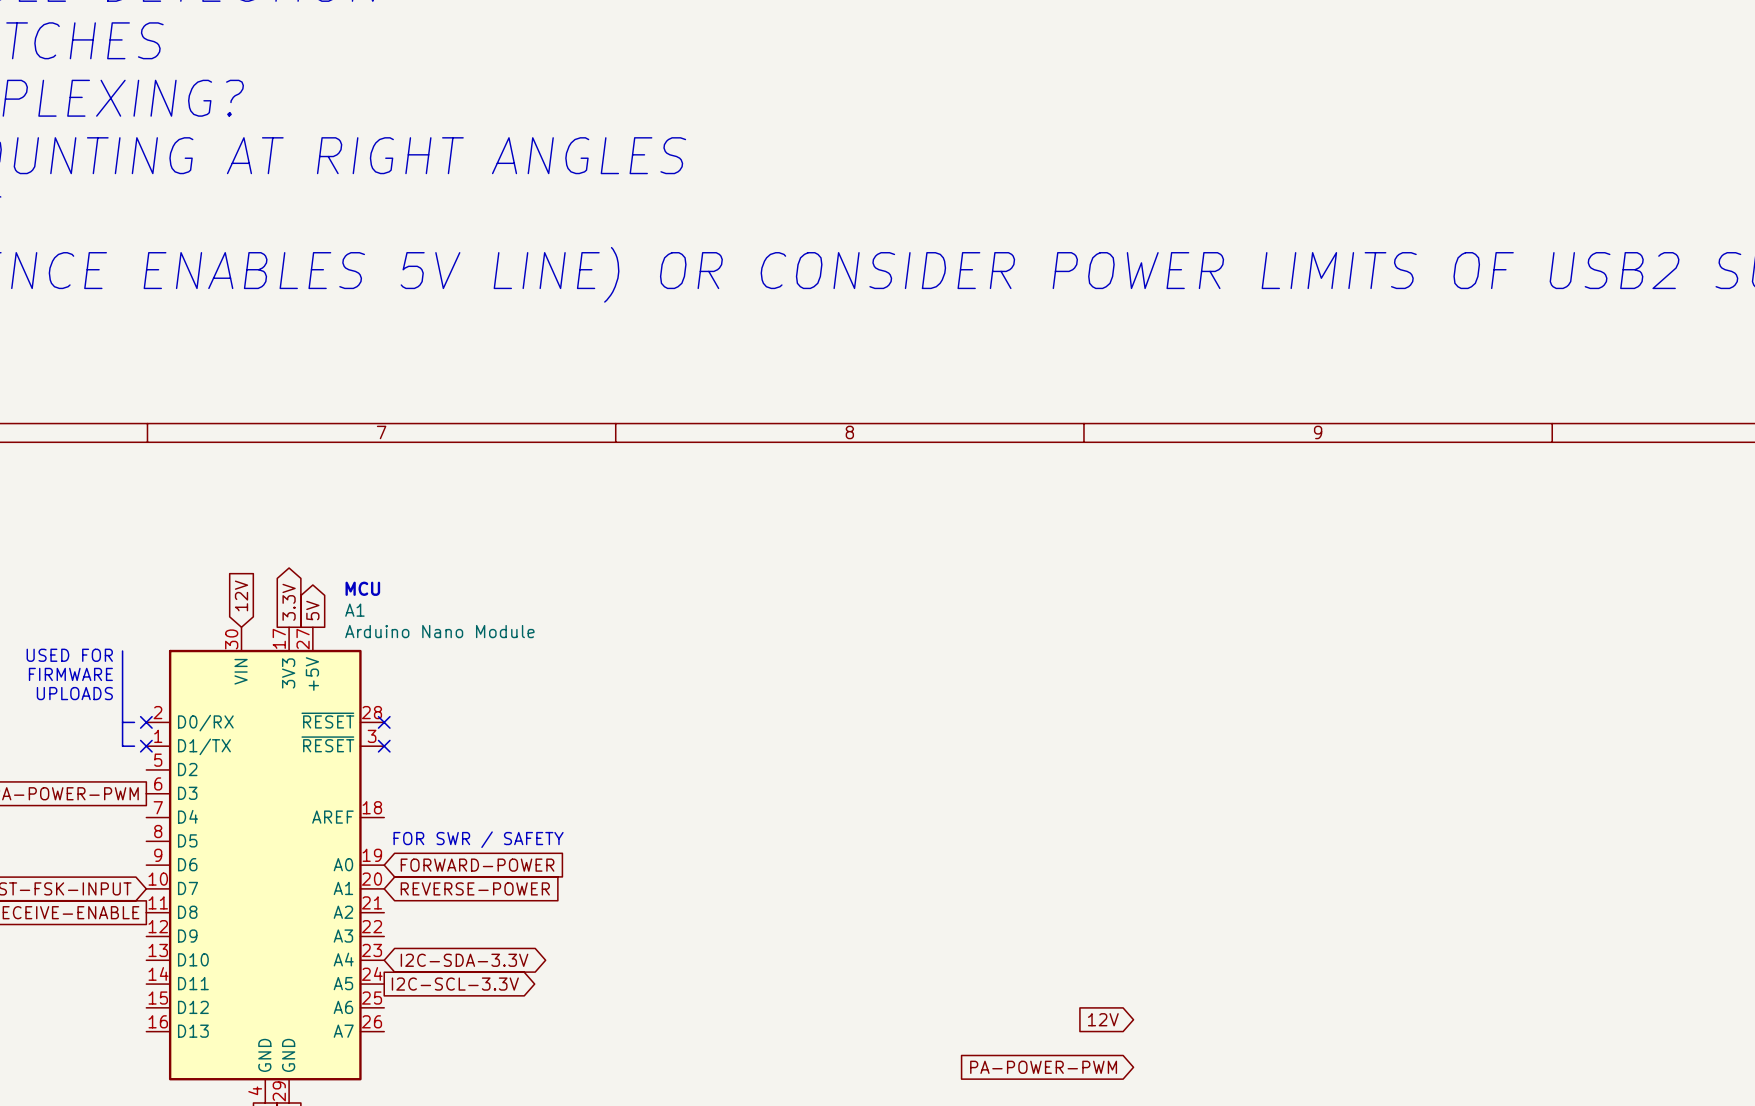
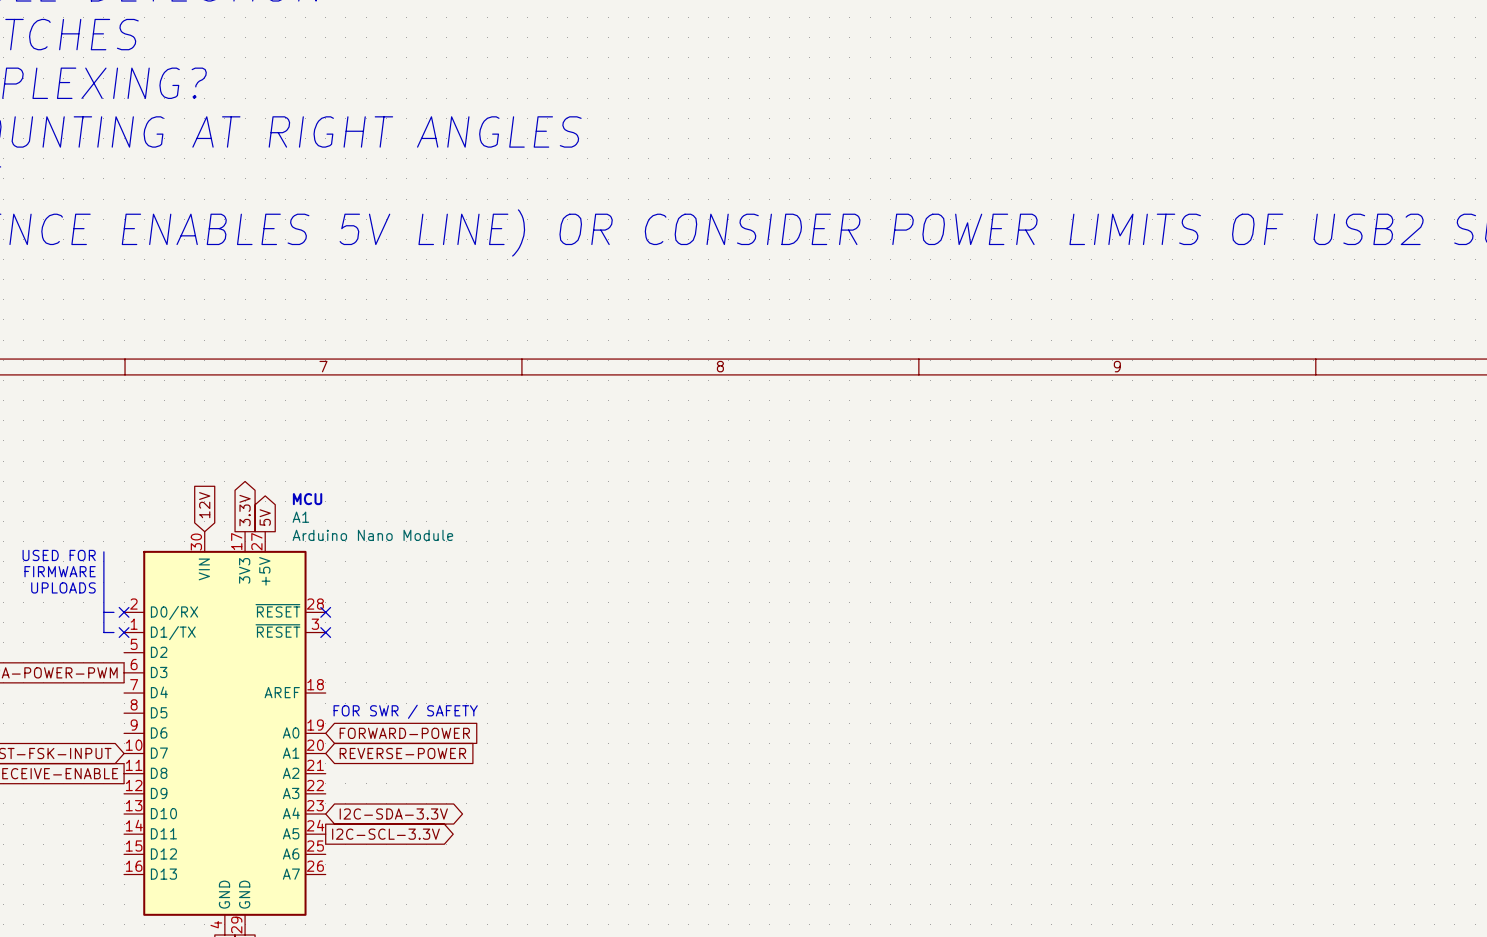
global label: 12V (1103, 1019) -> none
global label: PA-POWER-PWM (1043, 1067) -> none

